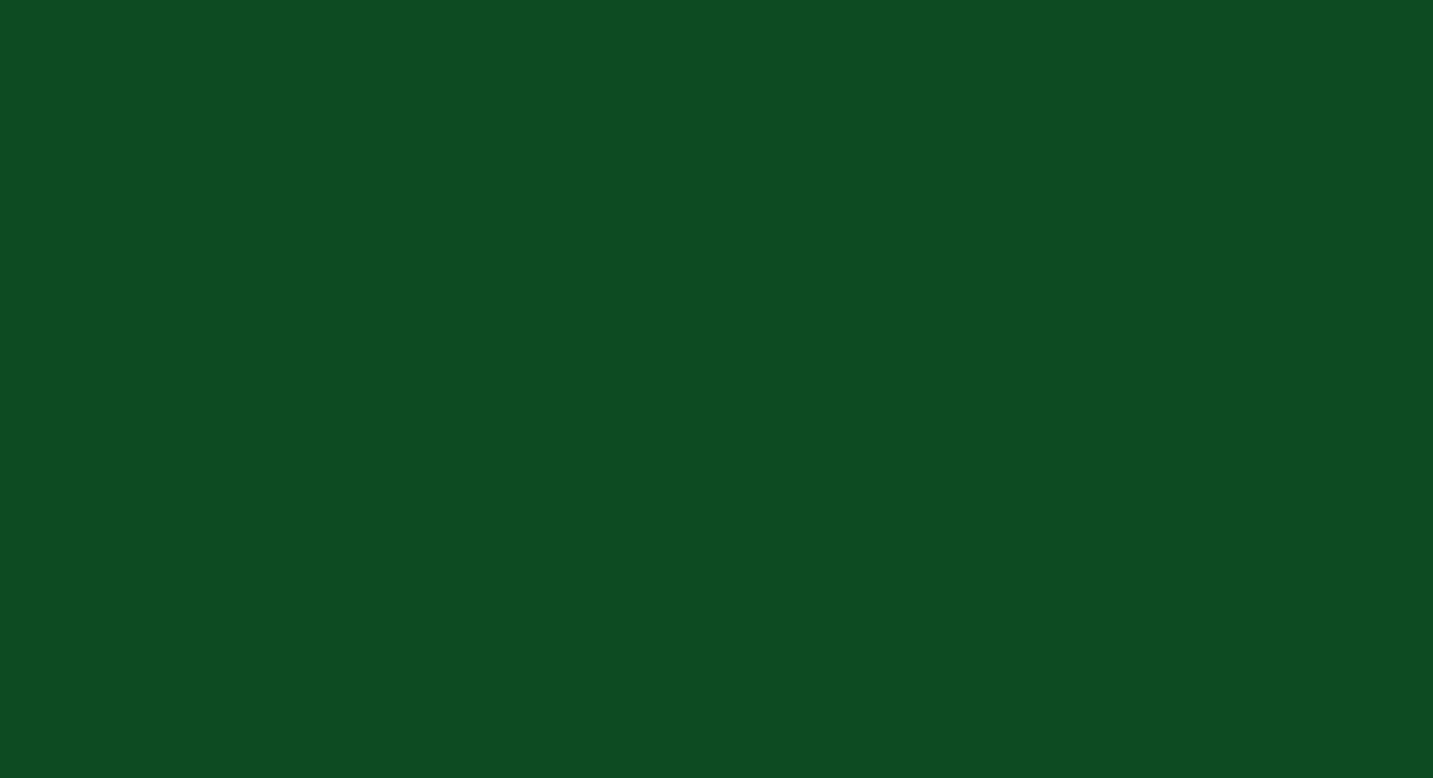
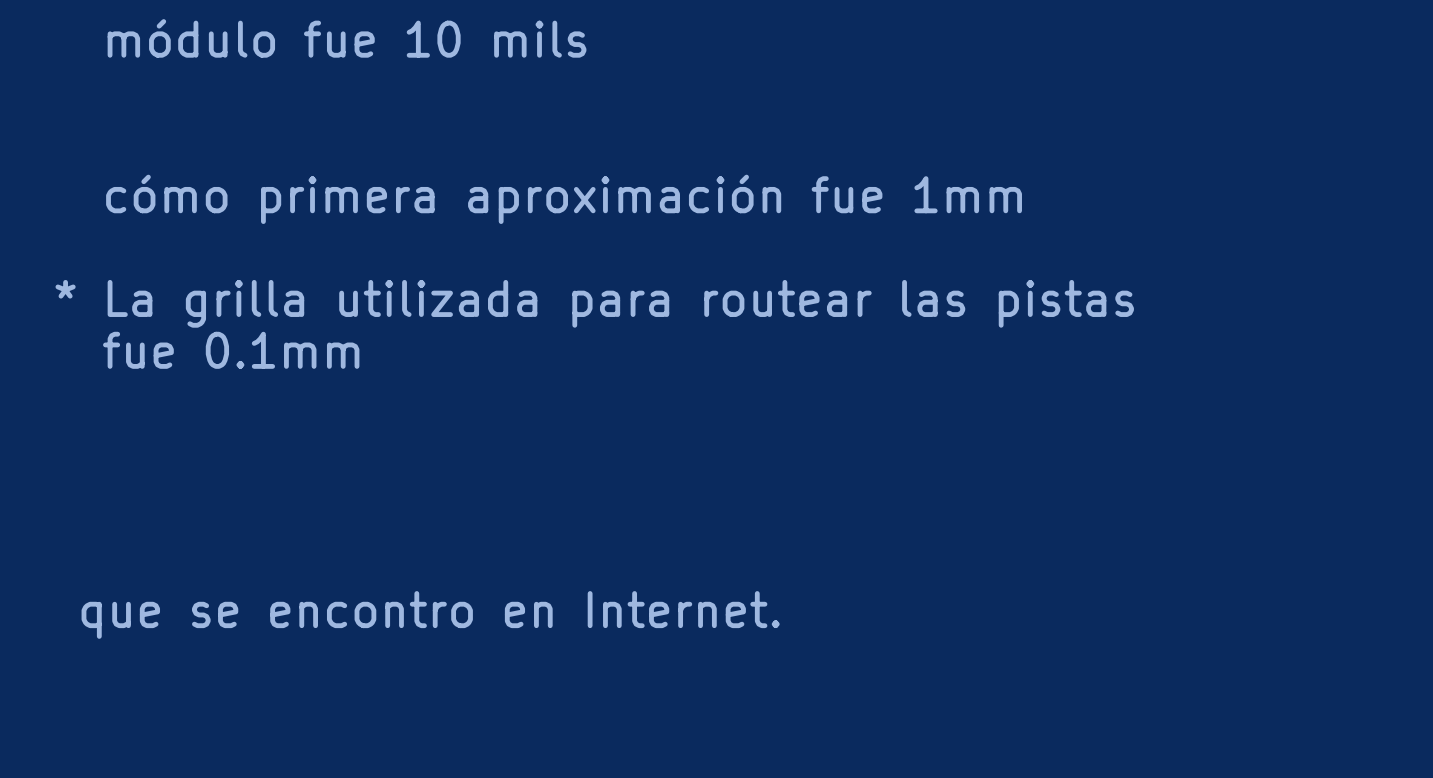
text: none -> módulo fue 10 mils (347, 38)
text: none -> cómo primera aproximación fue 1mm (564, 199)
text: none -> * La grilla utilizada para routear las pistas (594, 303)
text: none -> fue 0.1mm (231, 350)
text: none -> que se encontro en Internet. (430, 614)

